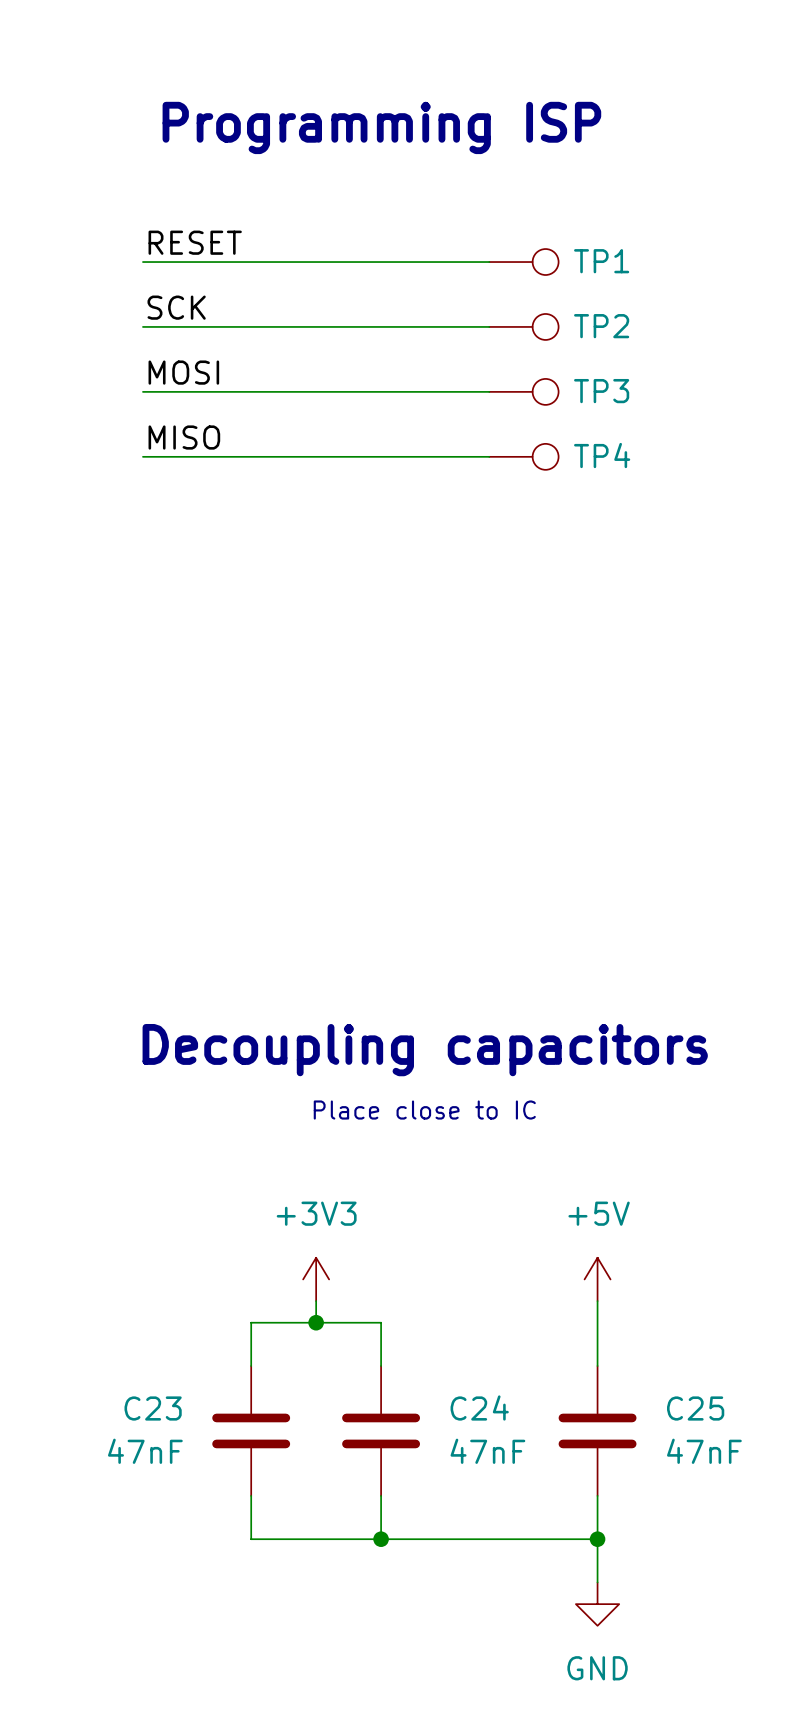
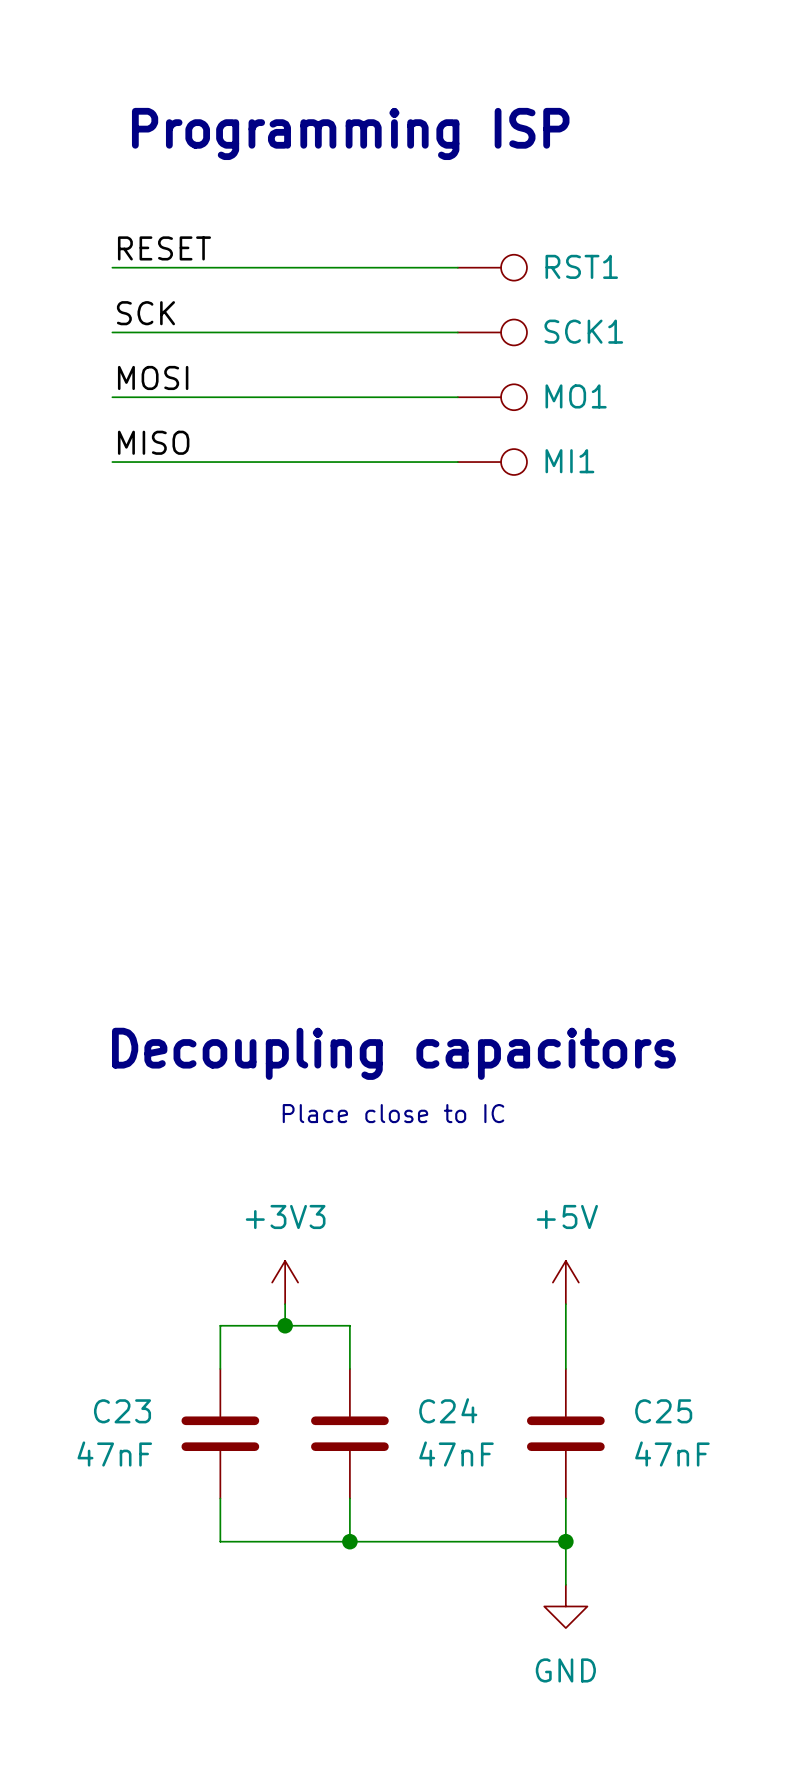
TP1 name: TP1 (601, 261) -> RST1 (581, 266)
TP2 name: TP2 (601, 326) -> SCK1 (583, 331)
TP3 name: TP3 (601, 391) -> MO1 (576, 396)
TP4 name: TP4 (602, 455) -> MI1 (569, 461)

